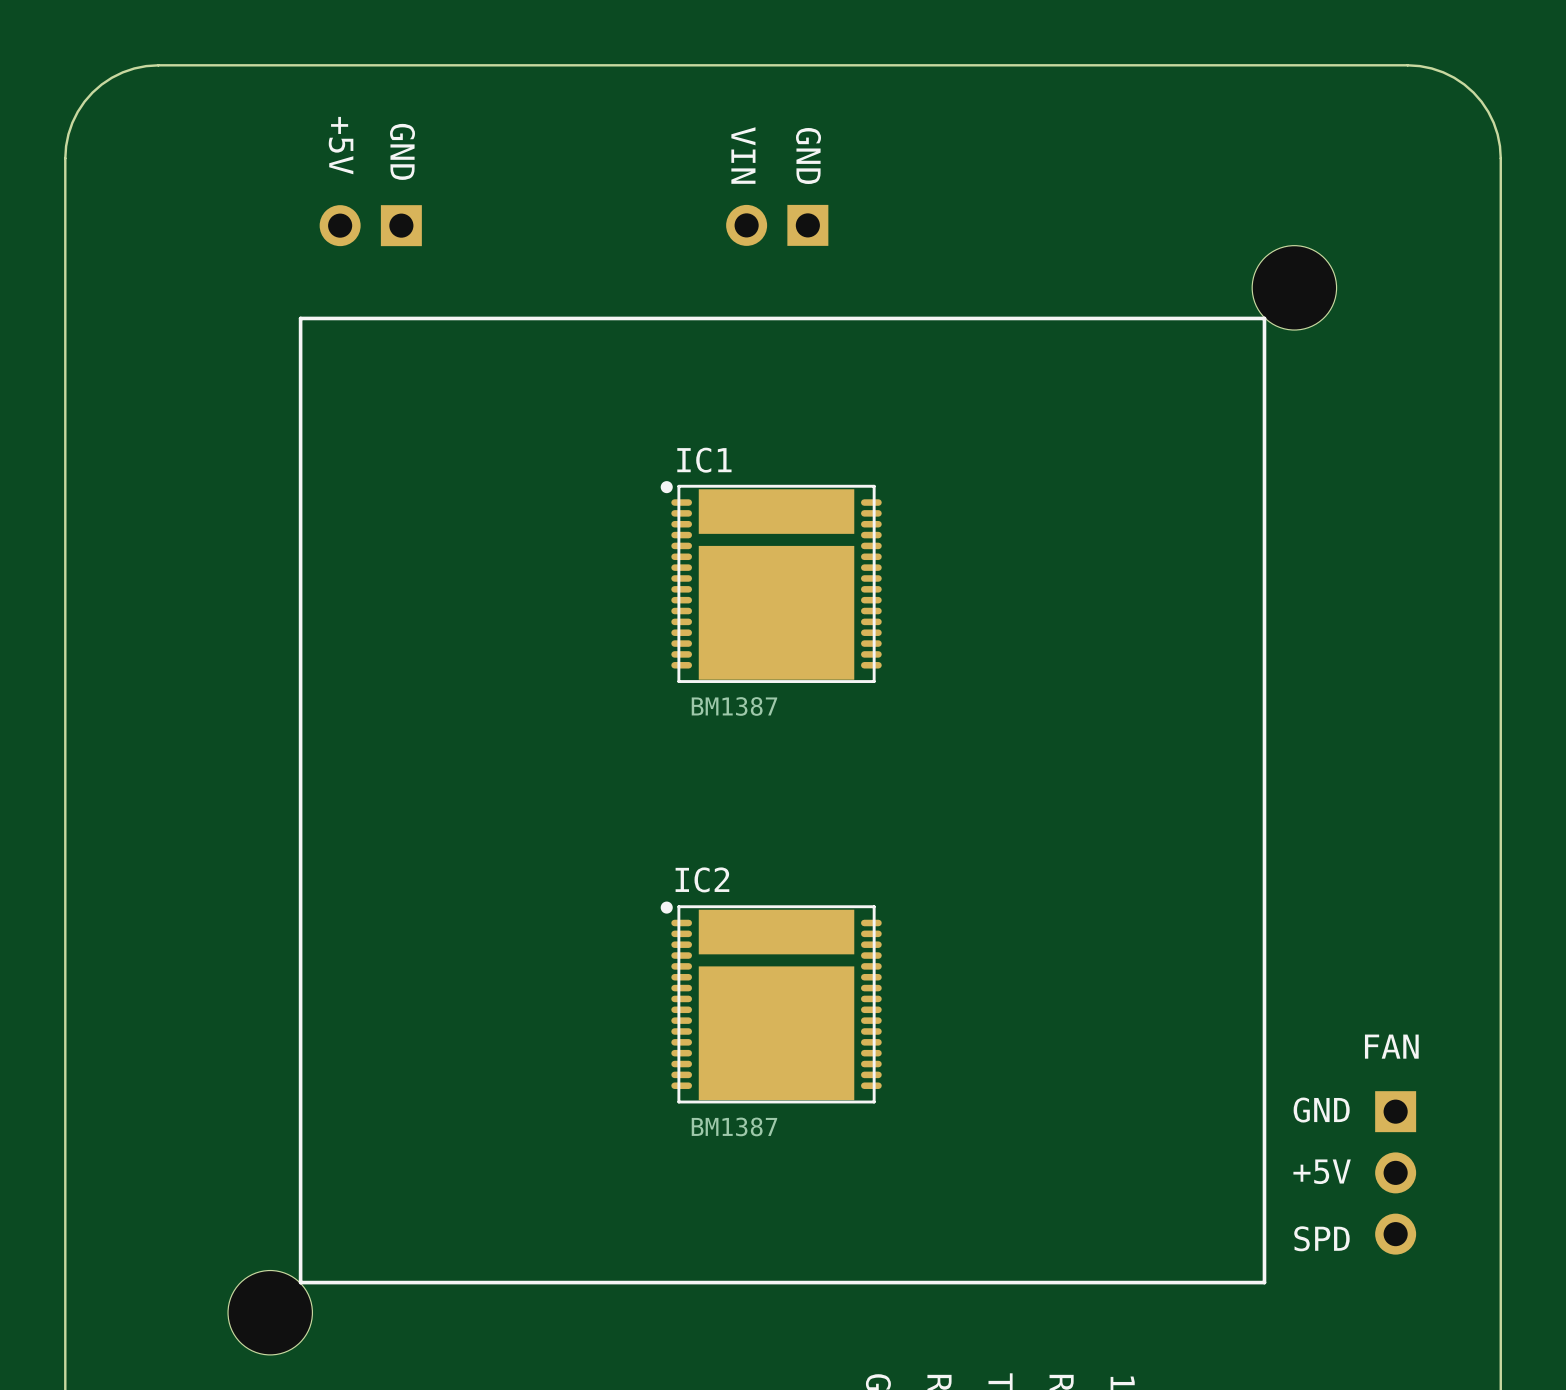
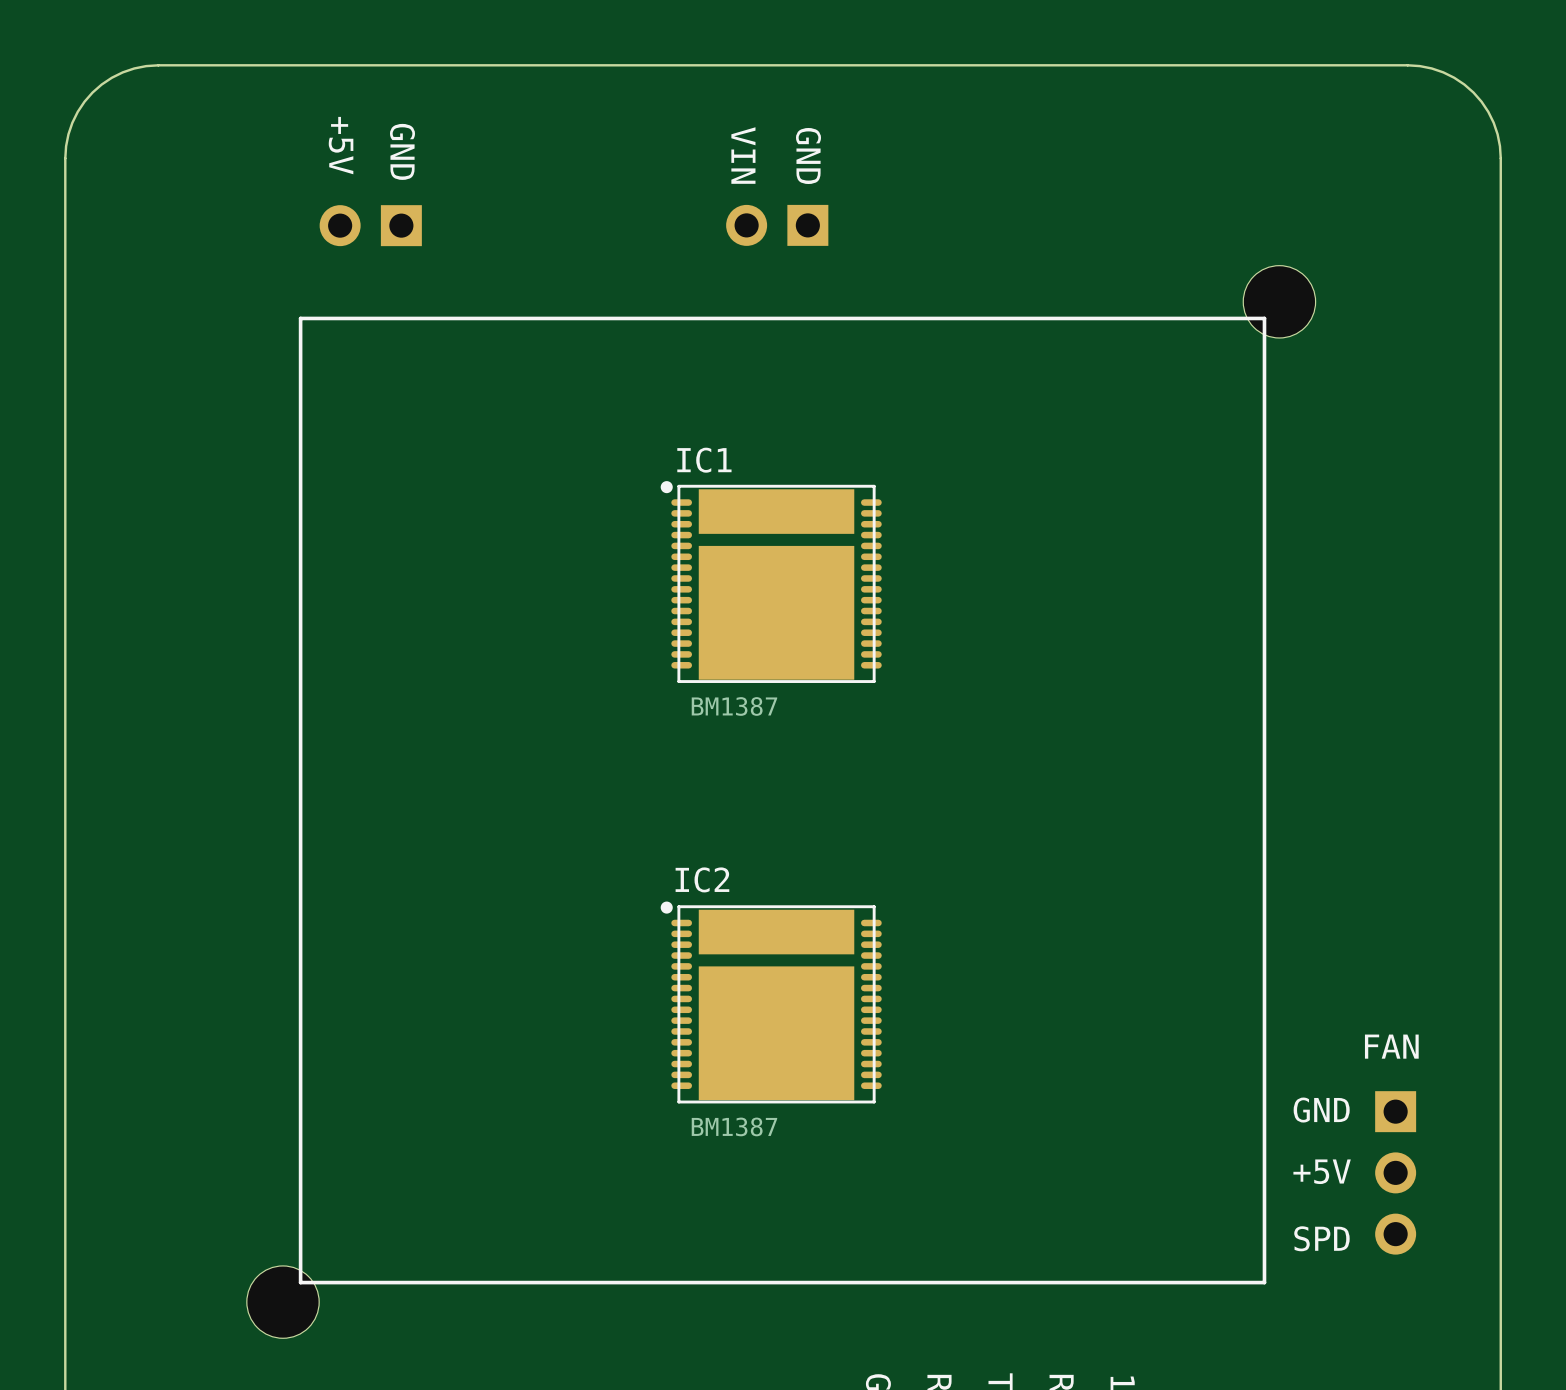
part footprint: [1252, 245, 1337, 331] -> [1243, 265, 1316, 338]
part footprint: [228, 1270, 313, 1355] -> [246, 1265, 320, 1339]

